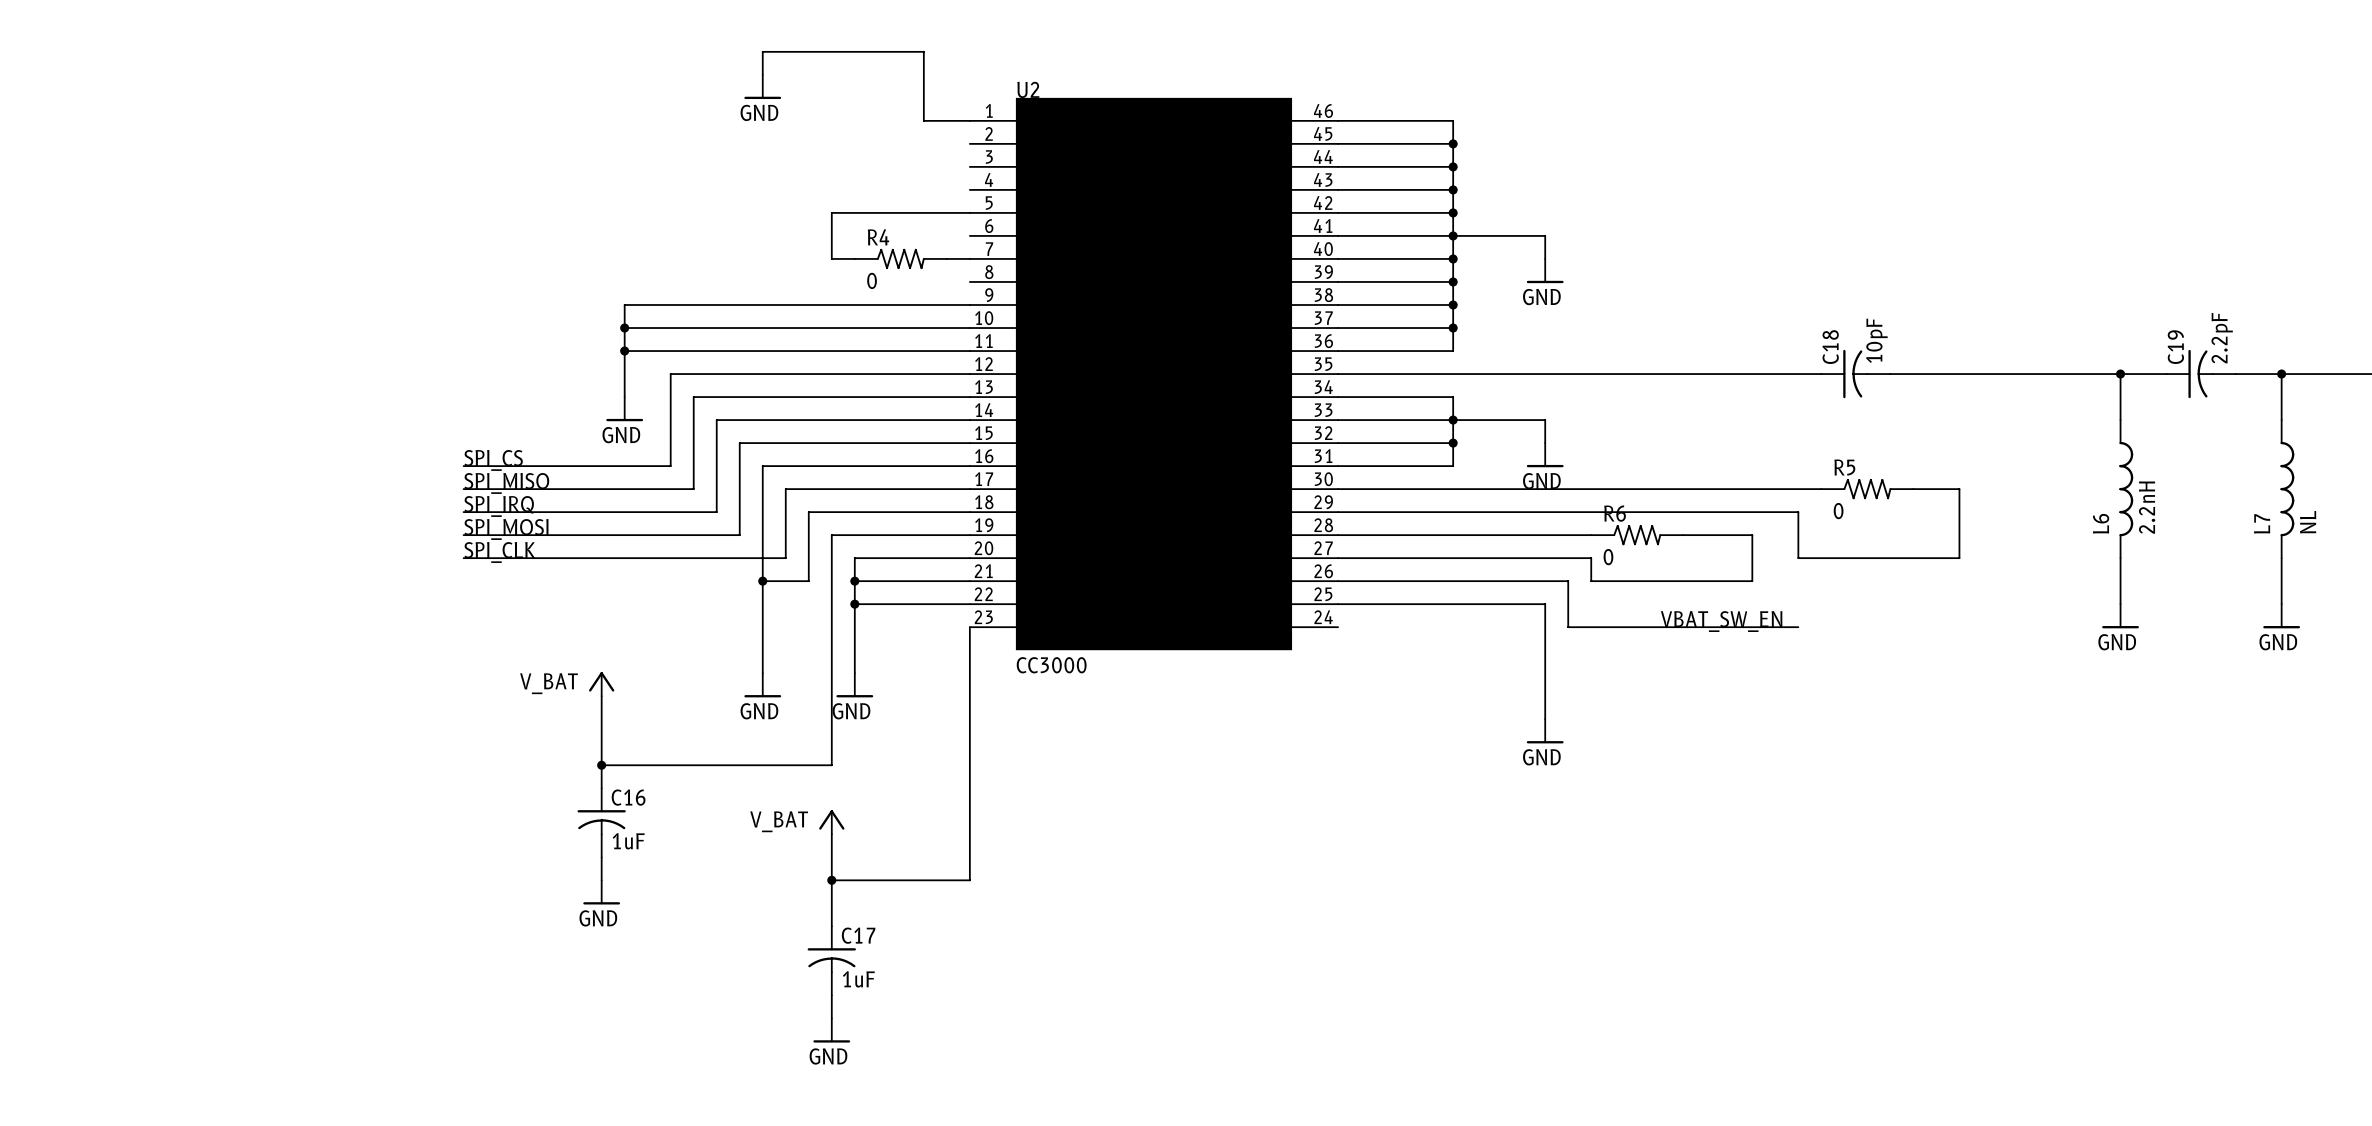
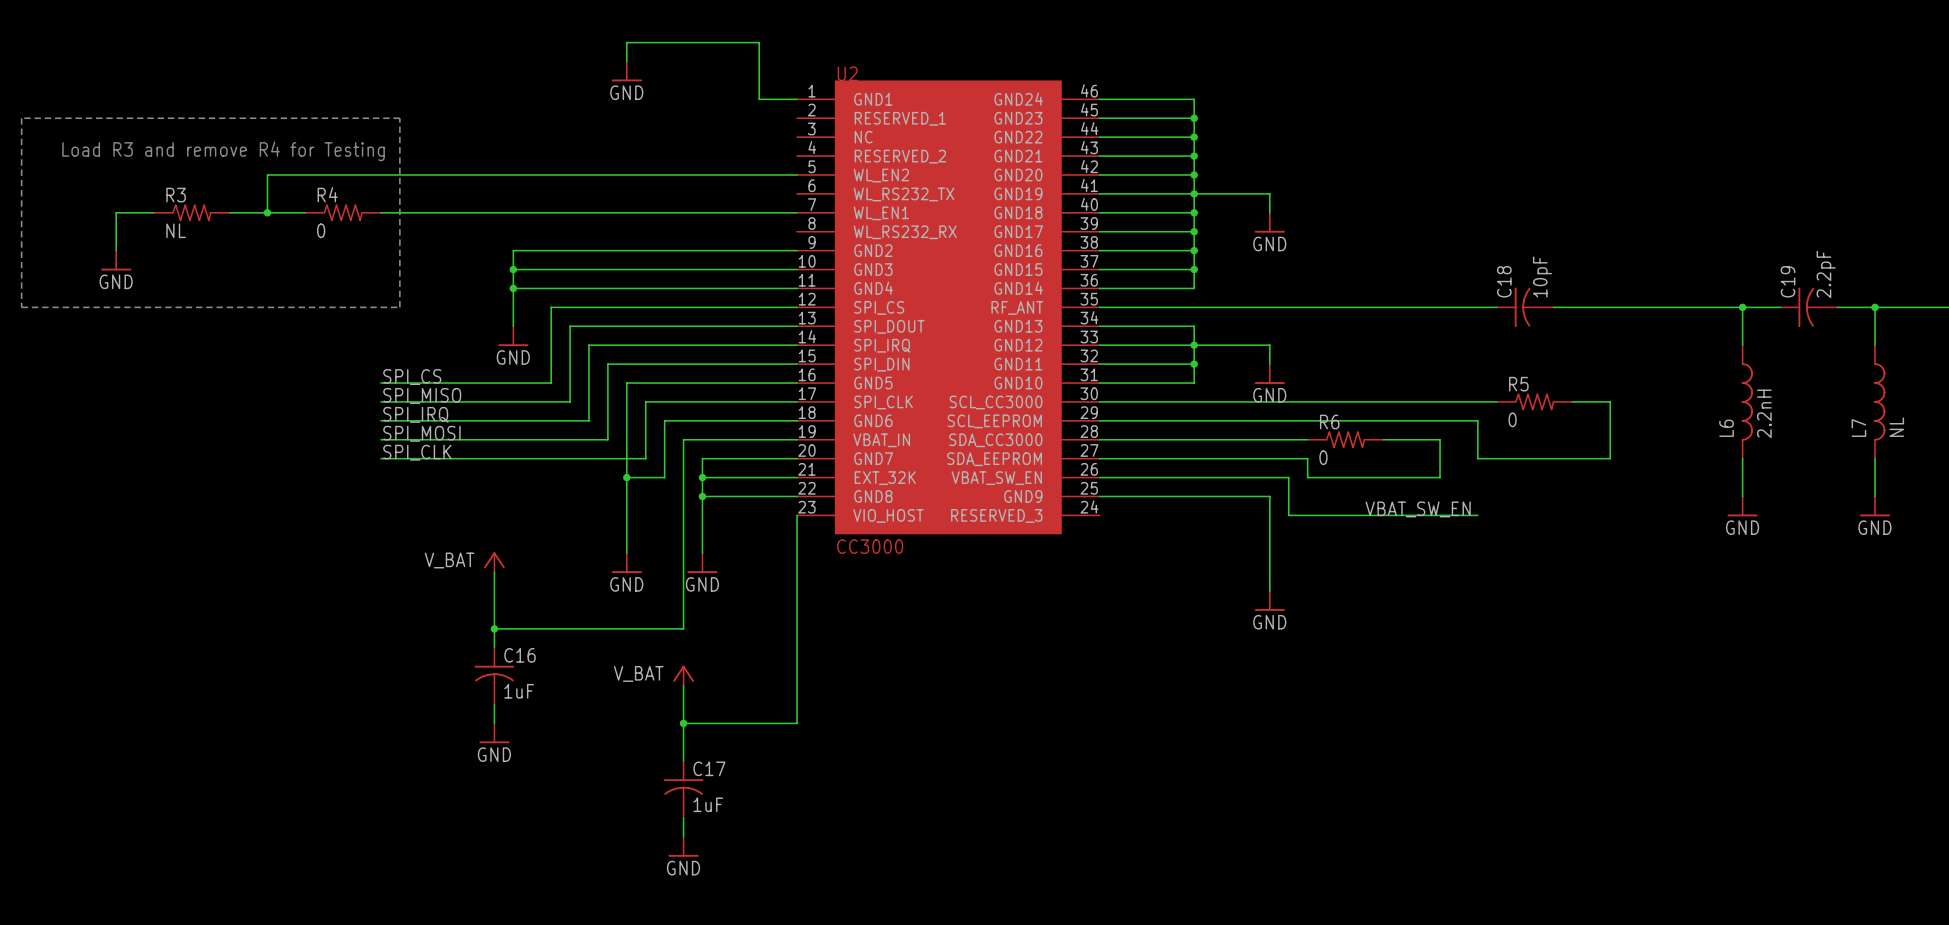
line: none -> (21, 118) (21, 307) (399, 307) (399, 118) (21, 118)
text: none -> Load R3 and remove R4 for Testing (223, 151)
wire: (831, 212) (831, 258) -> (380, 212) (683, 212)
wire: none -> (683, 174) (267, 174) (267, 212)
wire: none -> (154, 212) (116, 212) (116, 250)
R3: none -> NL (191, 212)
wire: none -> (229, 212) (305, 212)
junction: none -> (267, 212)
R4 position: (900, 258) -> (343, 212)
power symbol: none -> GND (116, 260)

